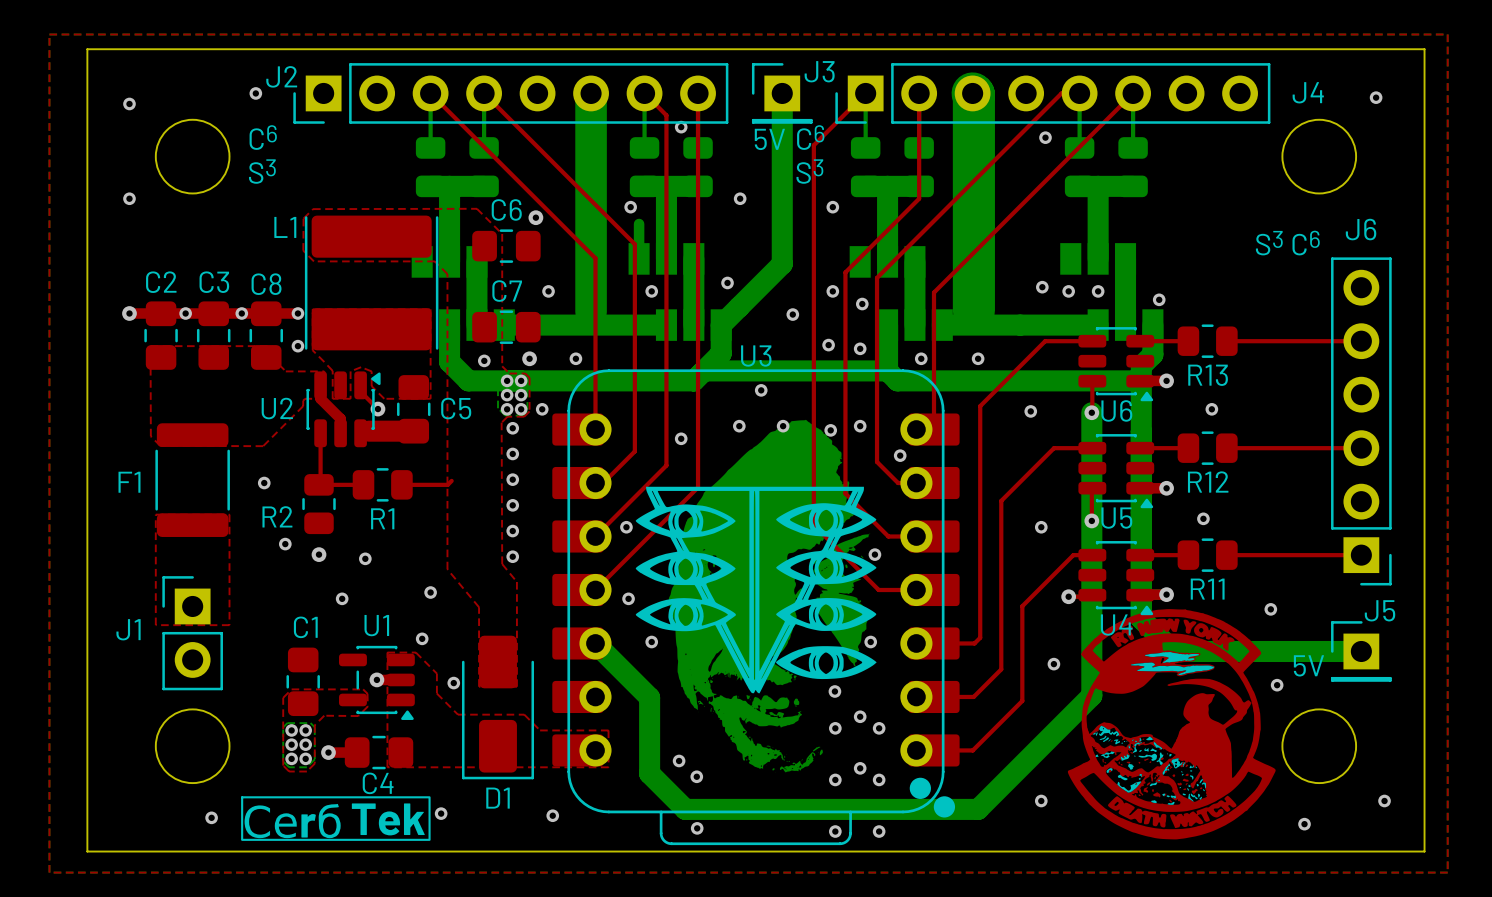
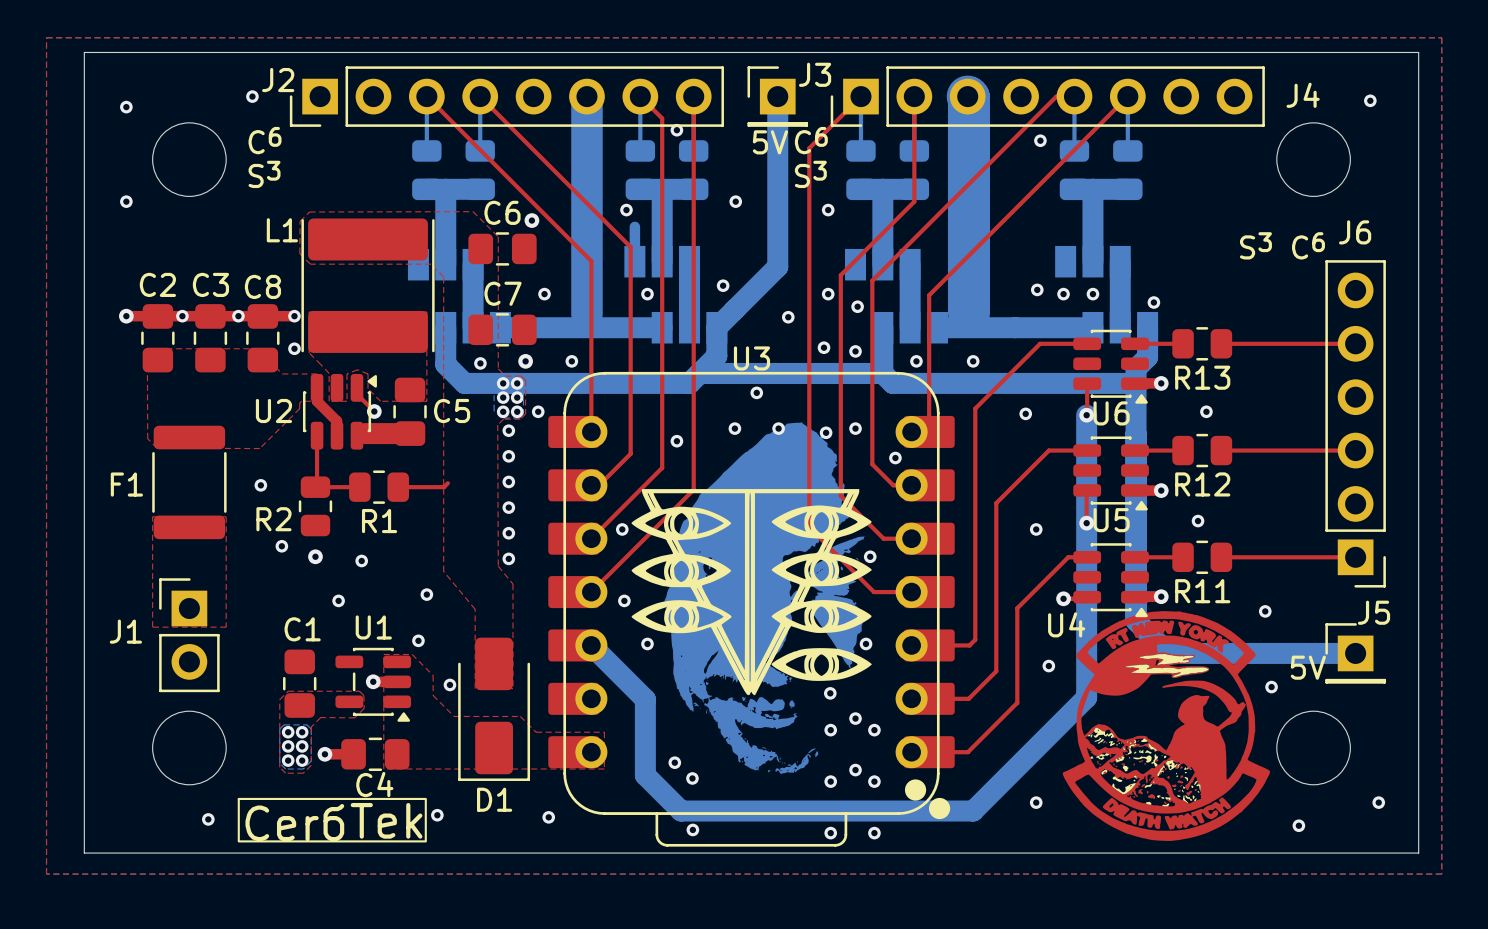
U4 name position: U4 (1116, 625) -> U4 (1066, 624)

